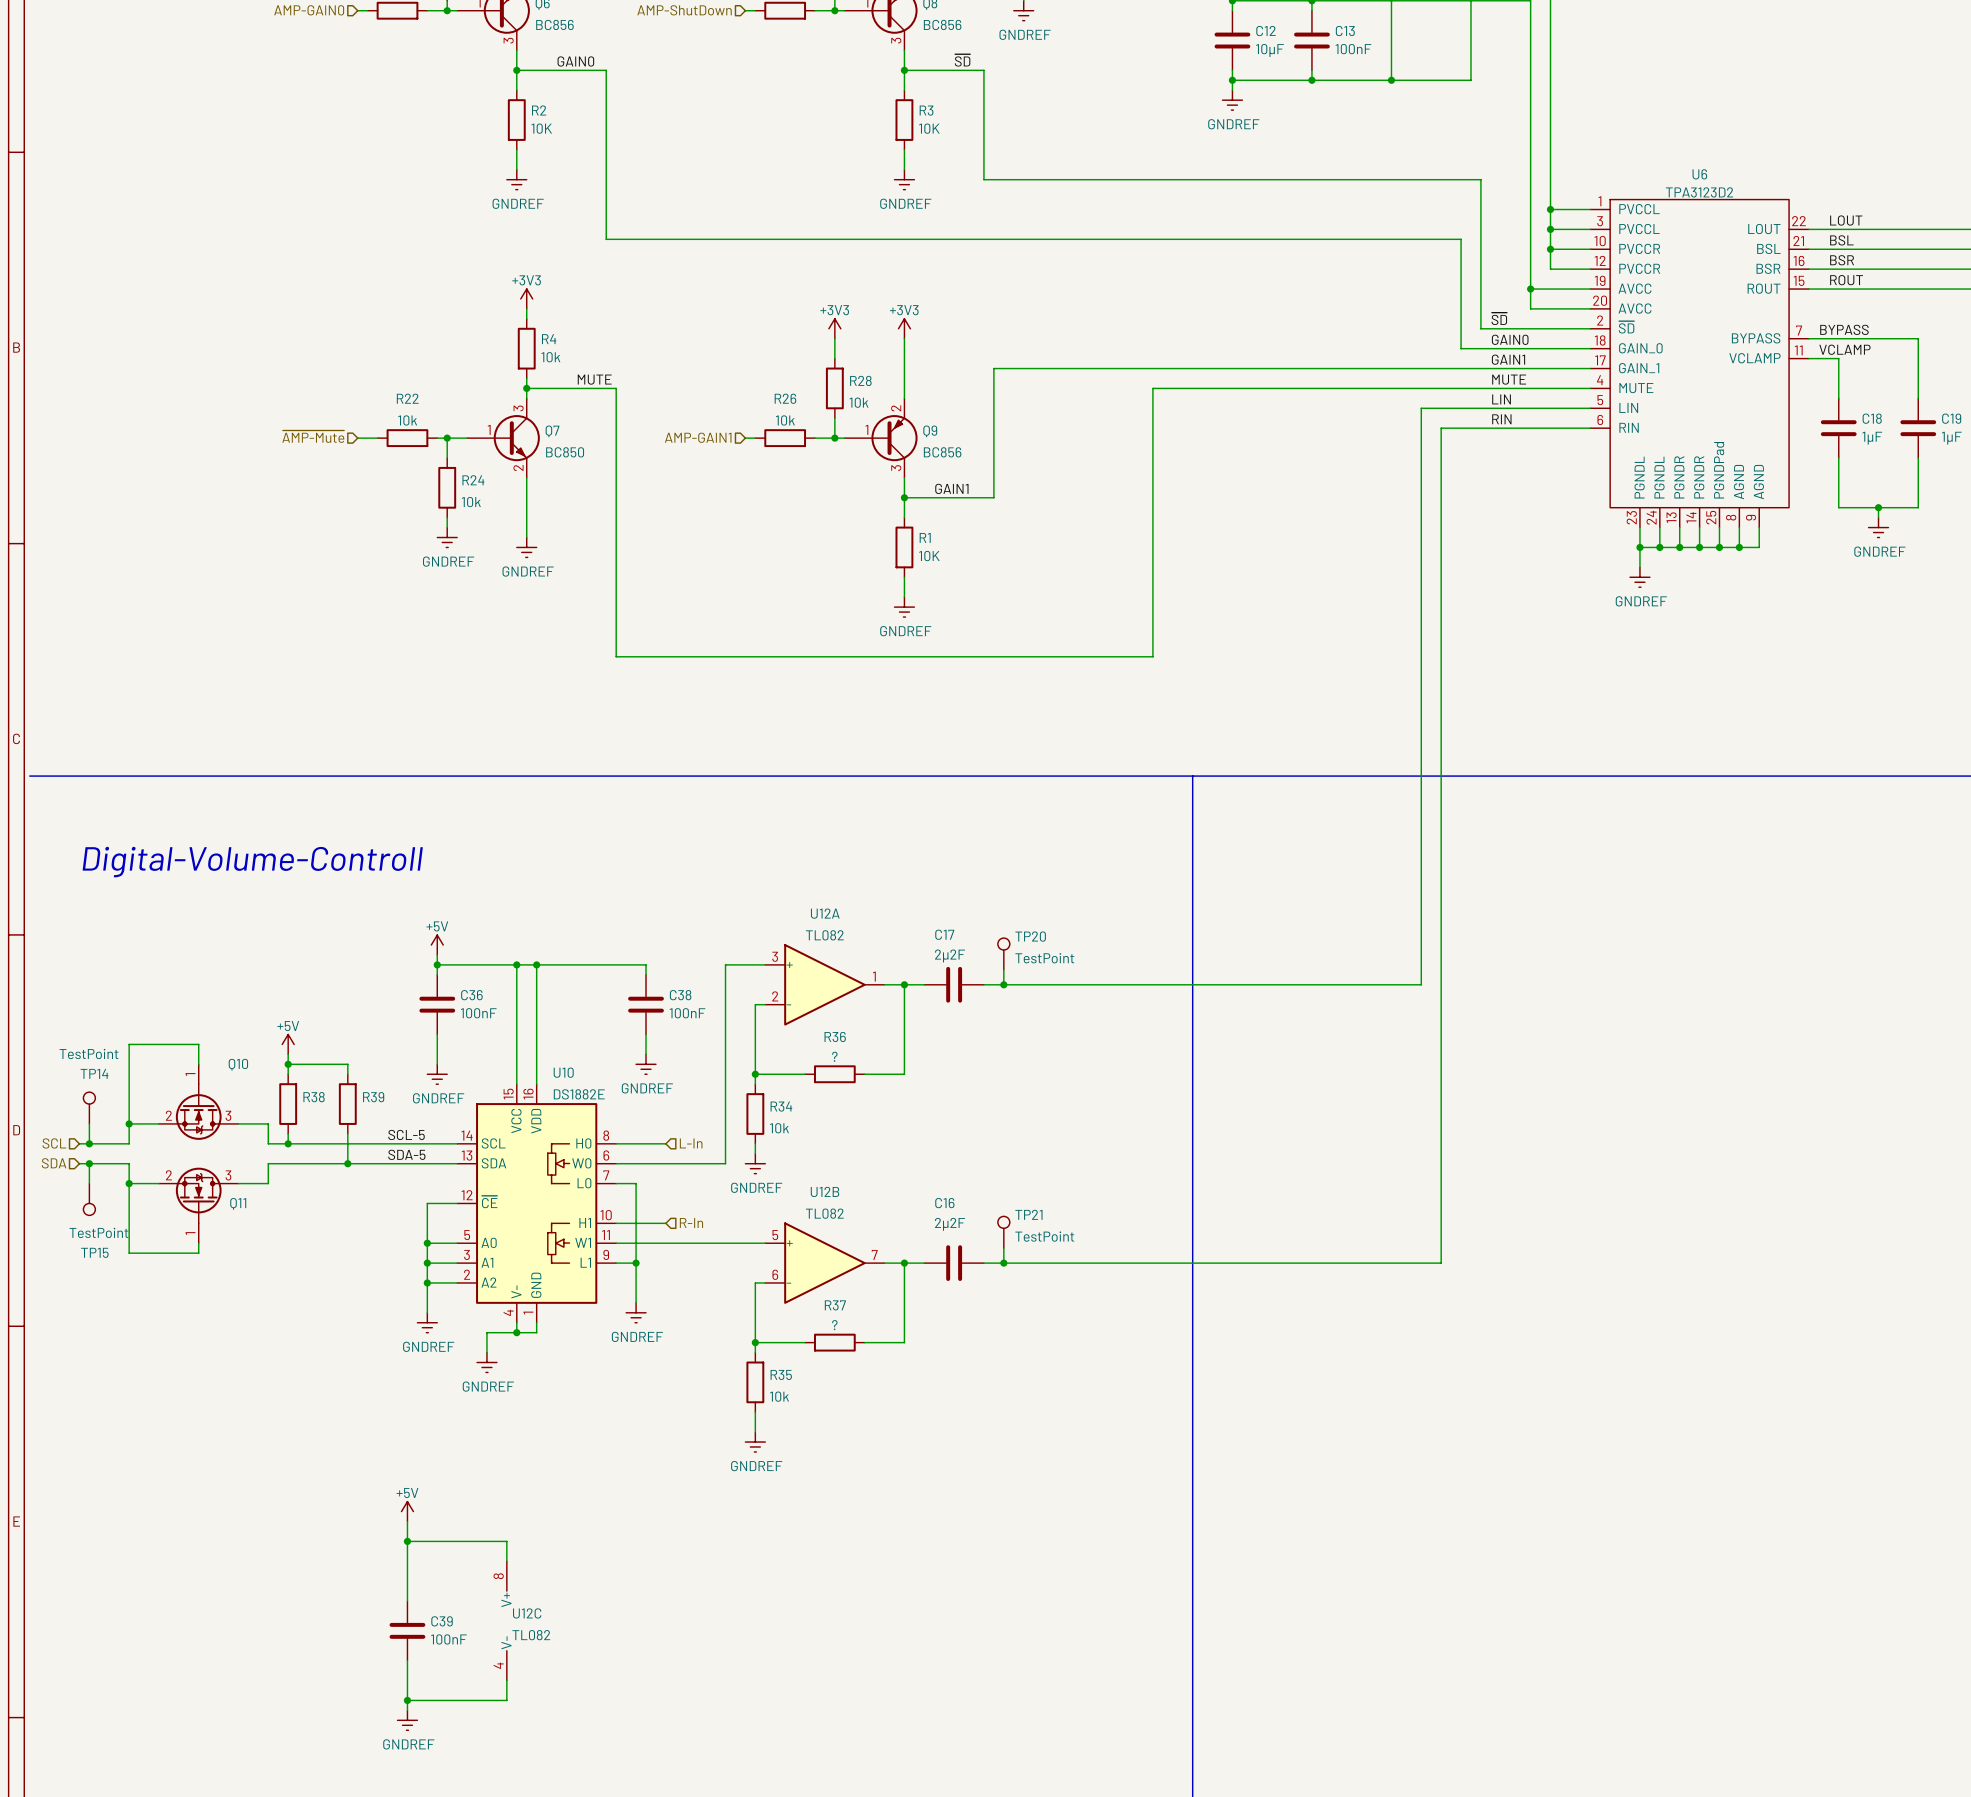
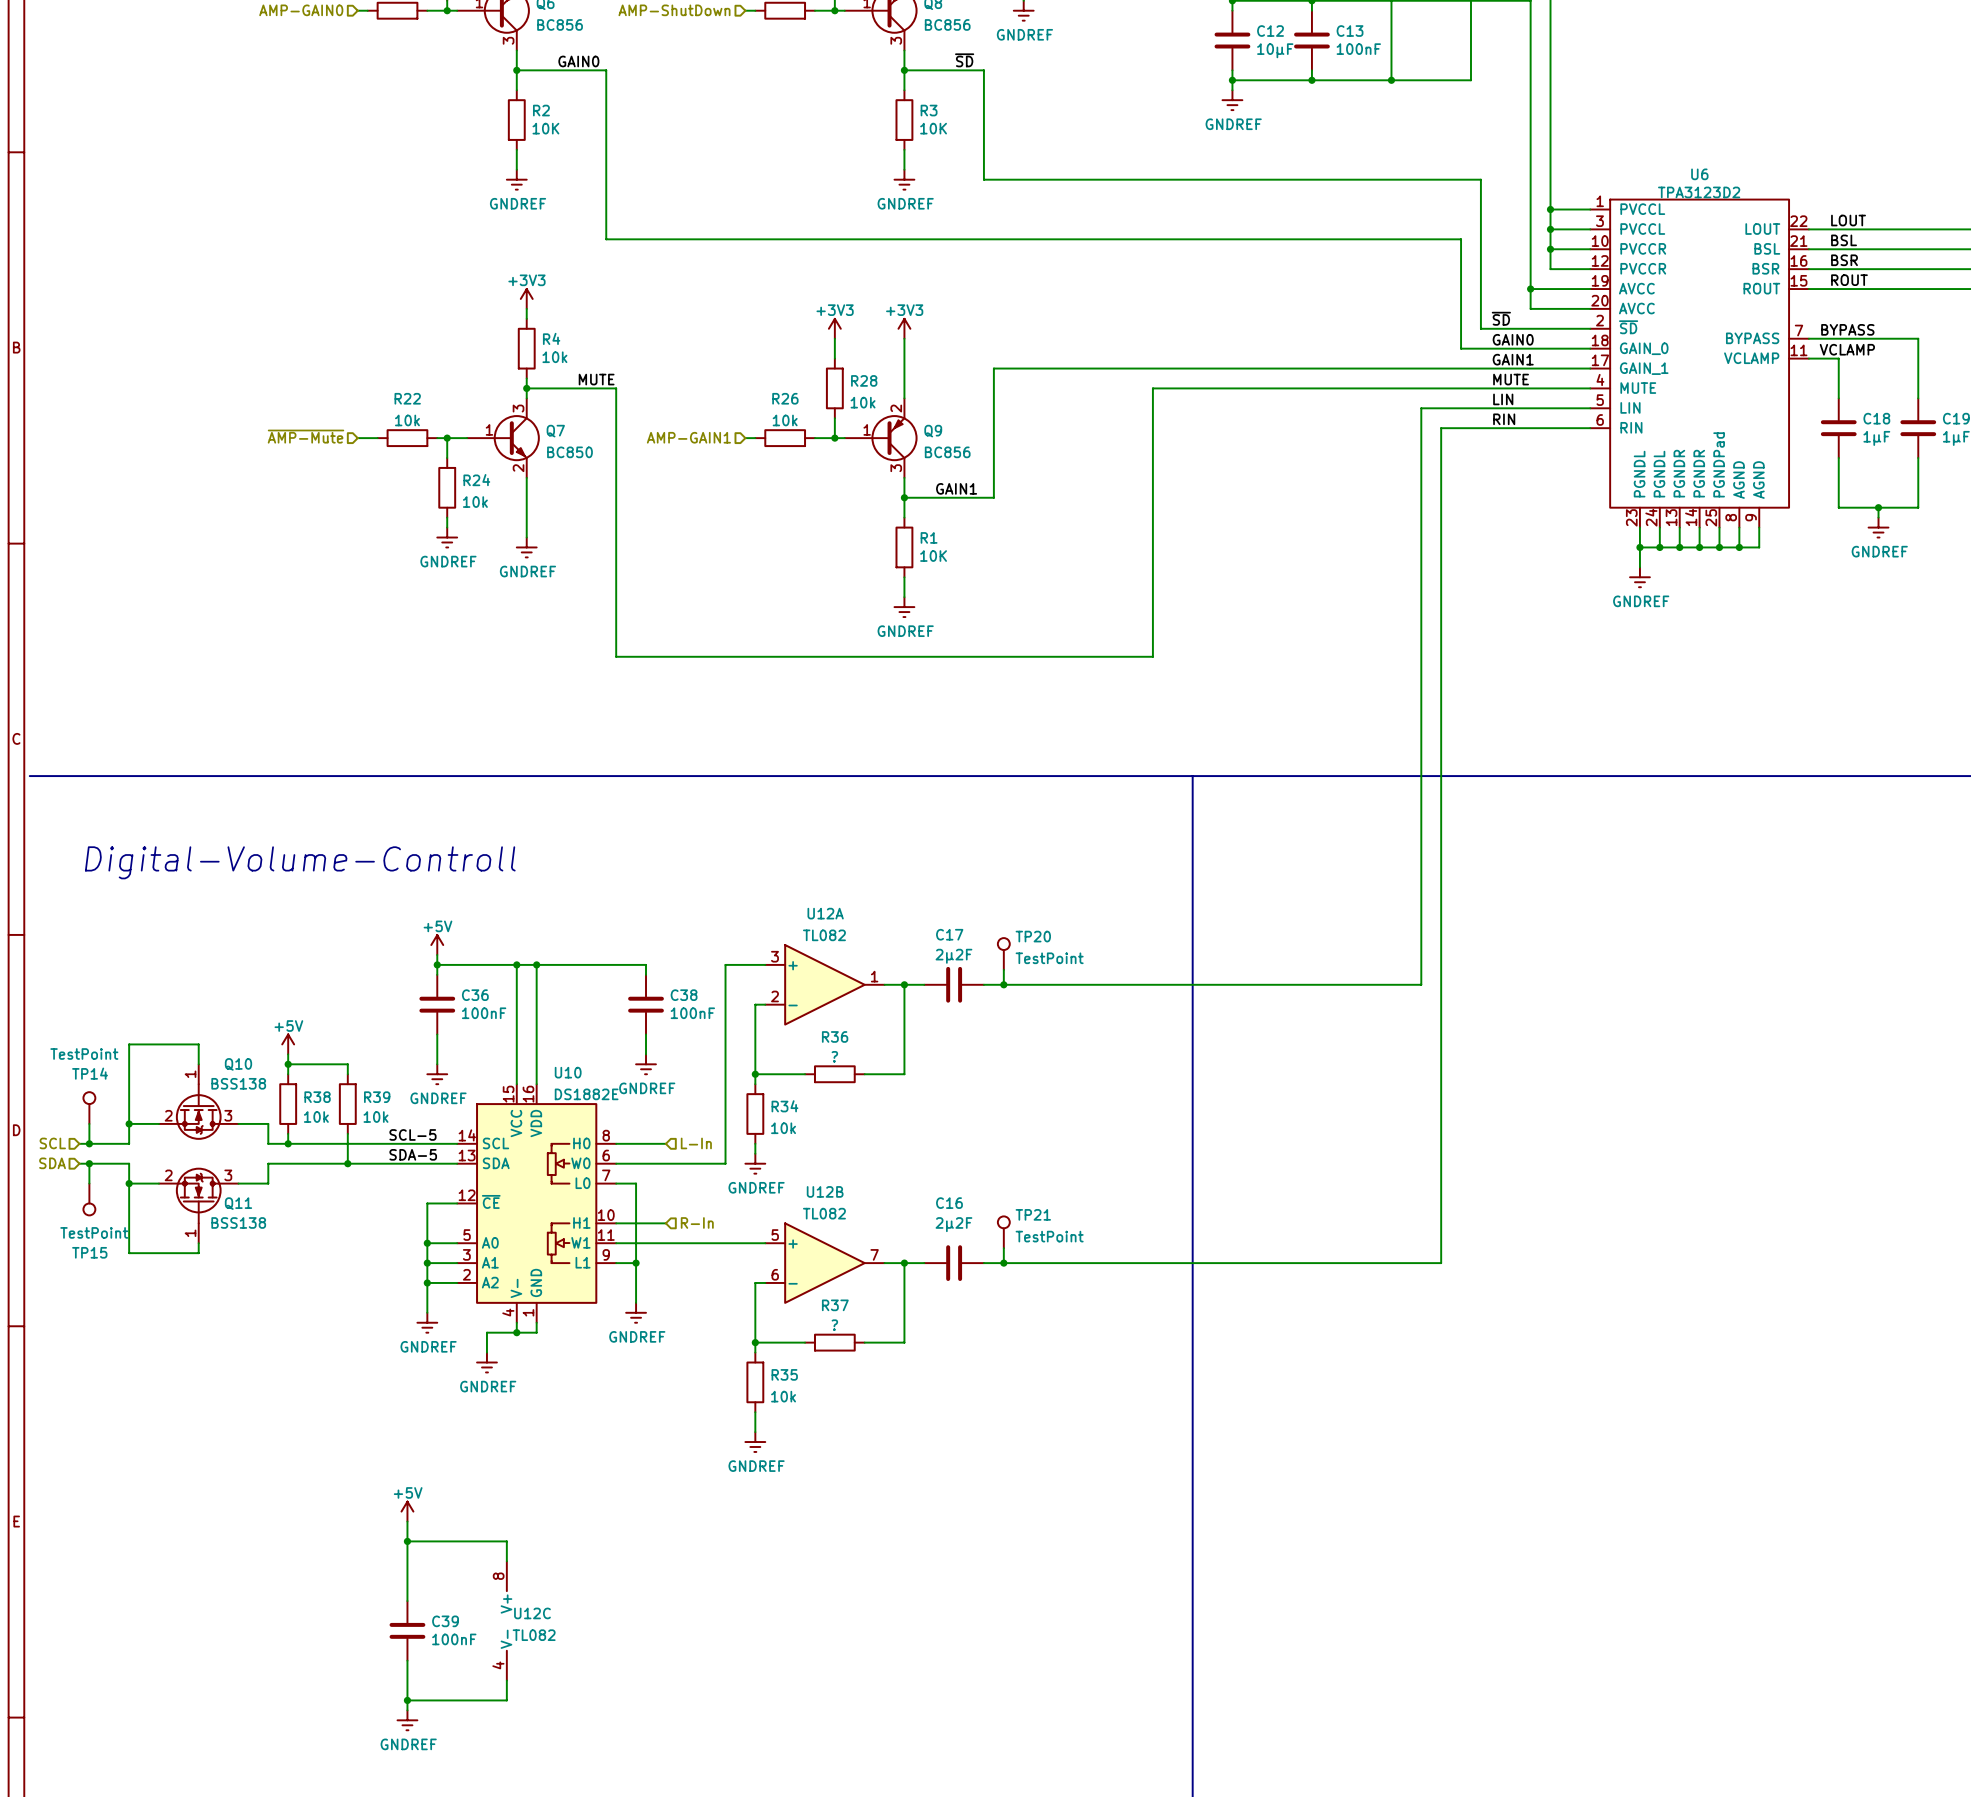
Q10 value: none -> BSS138 (238, 1083)
R38 value: none -> 10k (316, 1117)
R39 value: none -> 10k (376, 1117)
Q11 value: none -> BSS138 (238, 1222)

